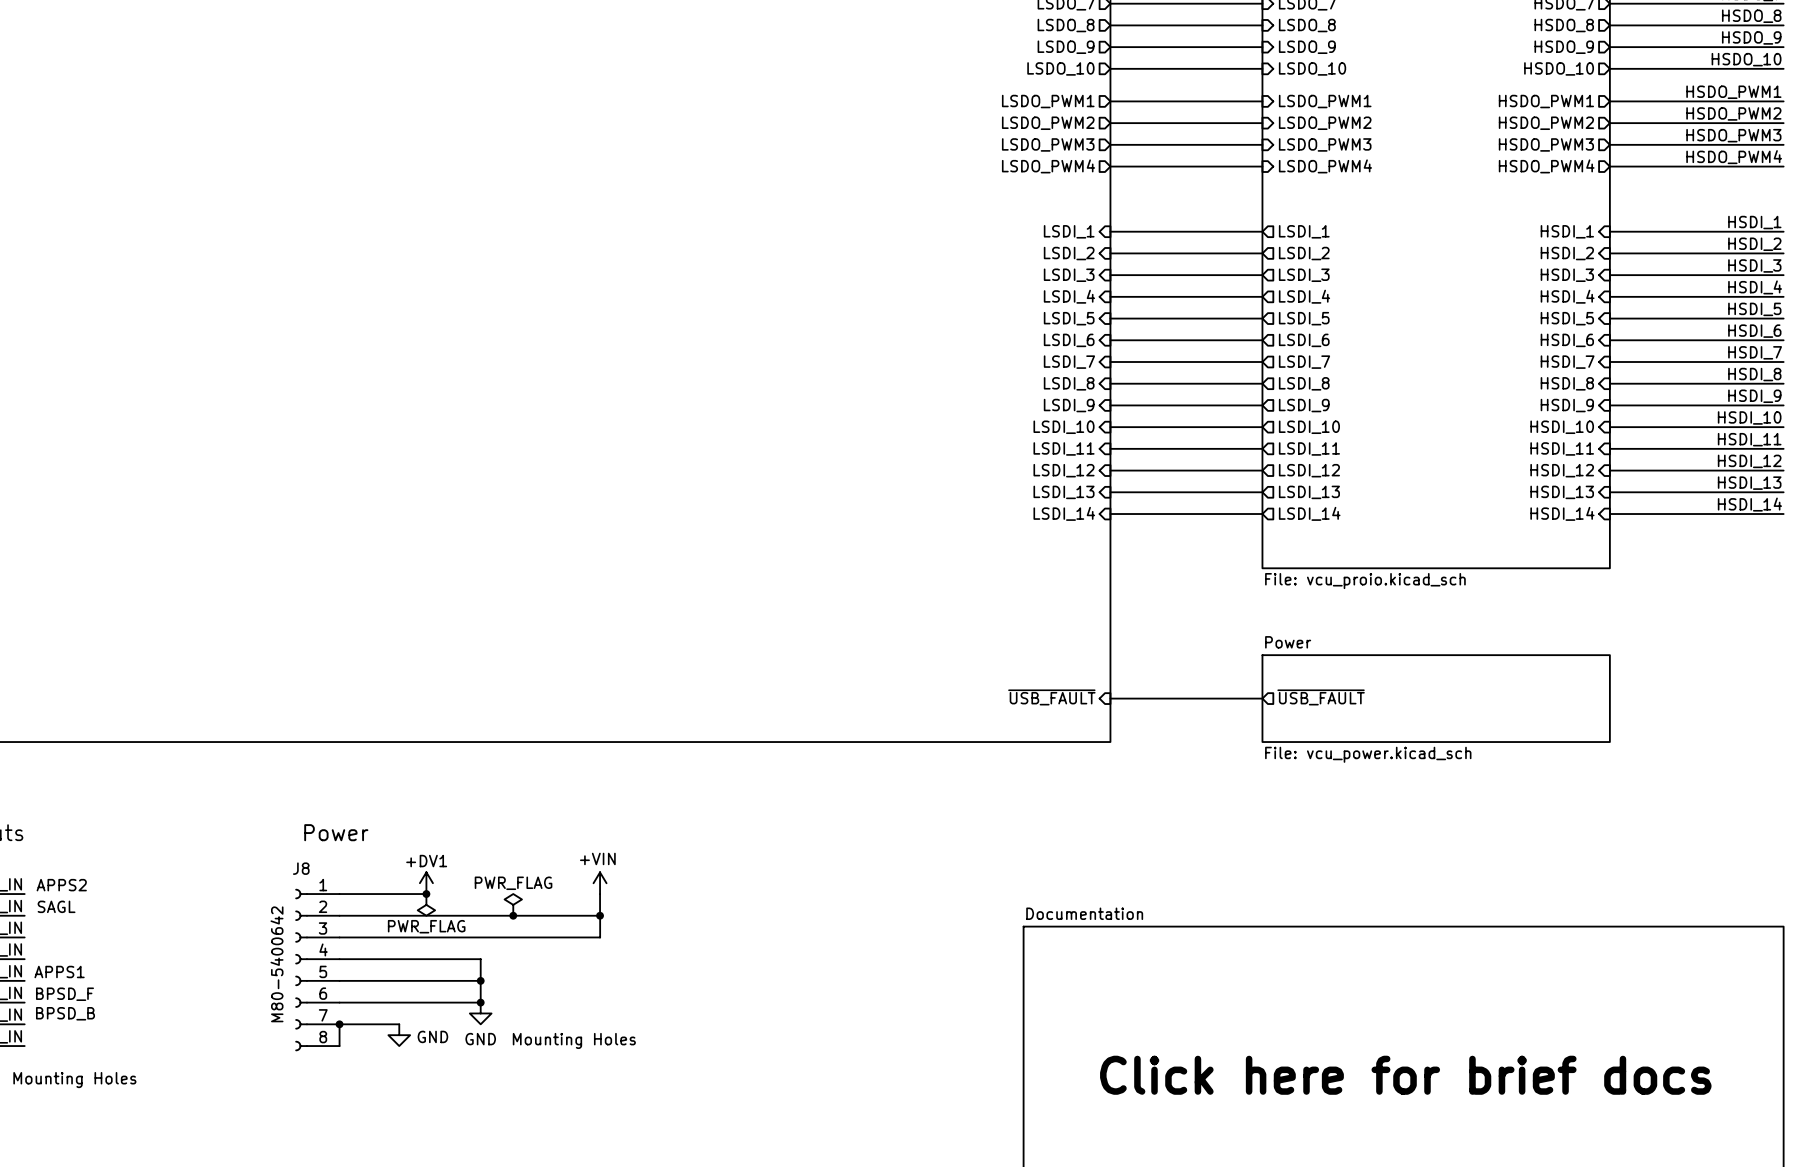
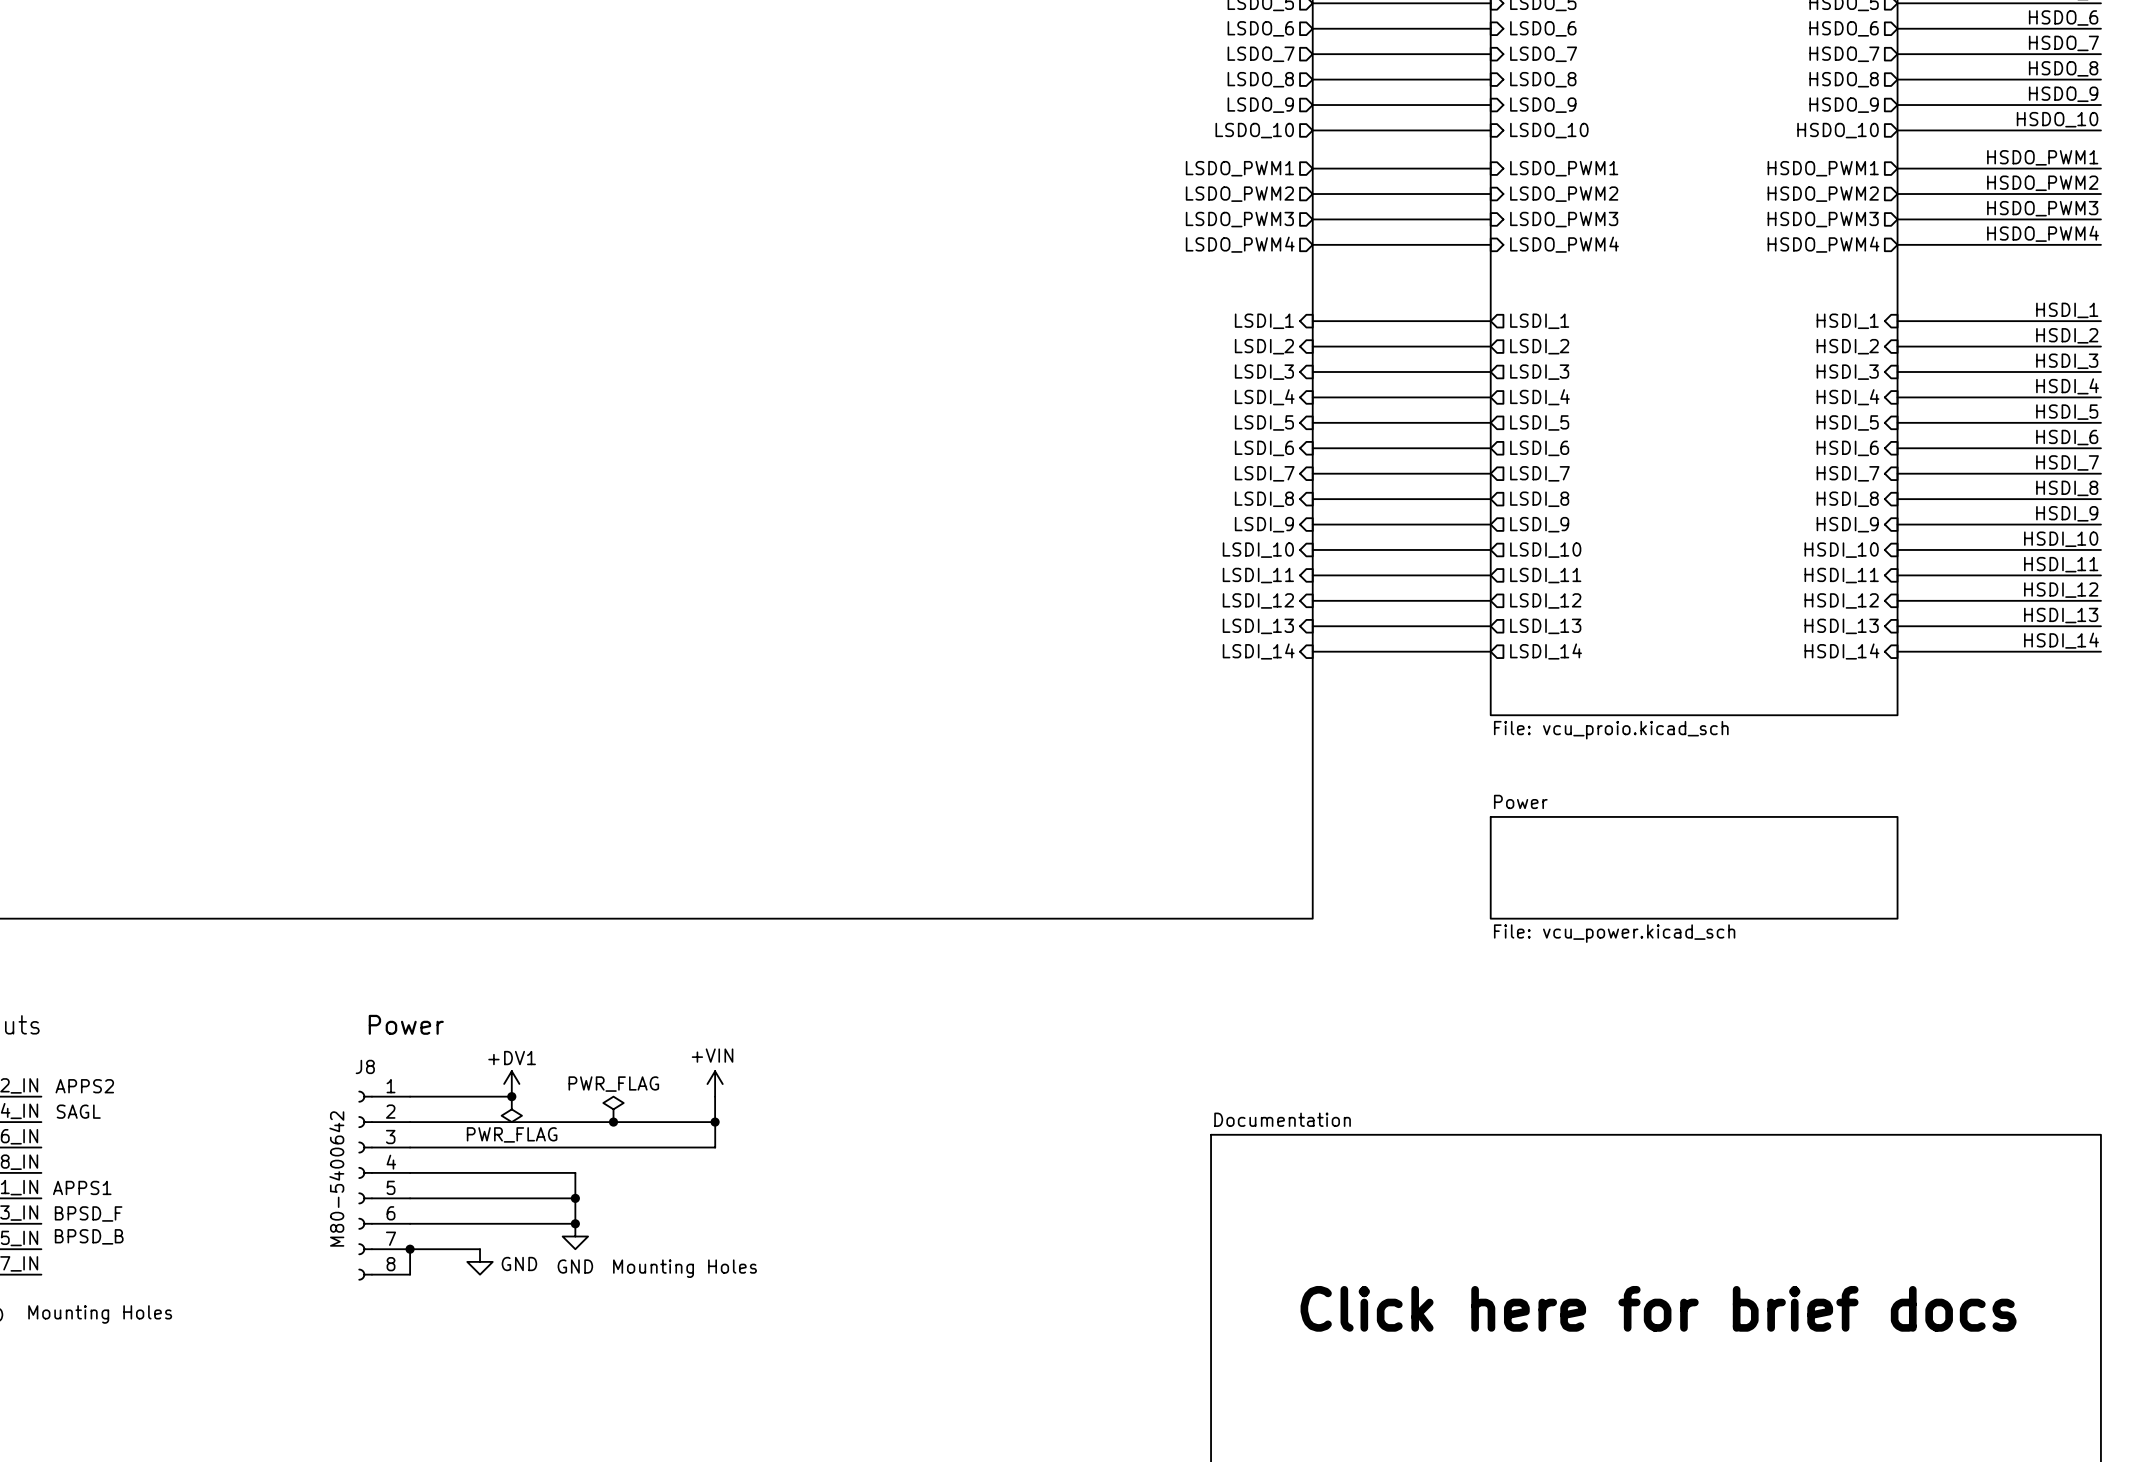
sheet pin: ~{USB_FAULT} (1051, 697) -> none
sheet pin: ~{USB_FAULT} (1321, 697) -> none
wire: (1110, 698) (1262, 698) -> none

